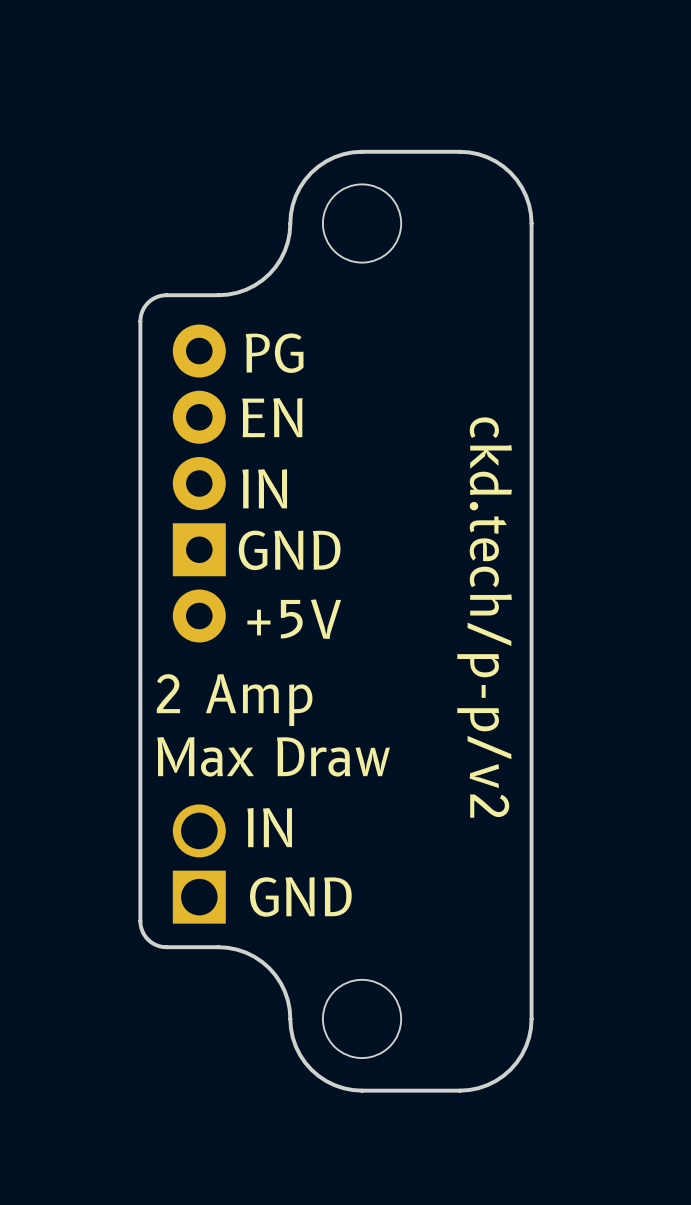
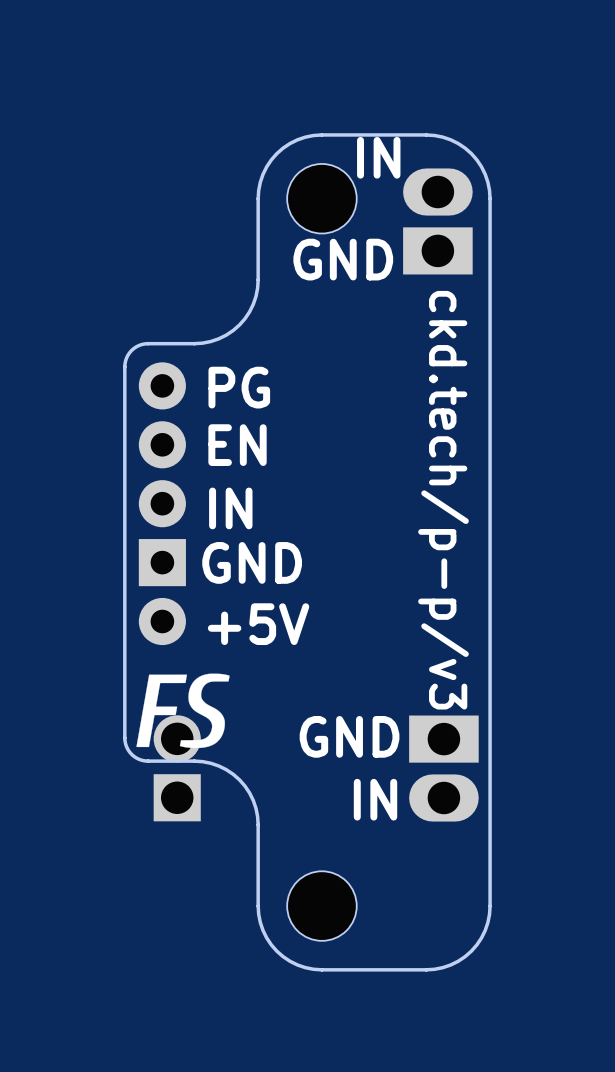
board edge: (459, 151) (487, 157) (510, 172) (526, 196) (531, 223) (530, 1028) (521, 1054) (503, 1075) (487, 1085) (459, 1090) -> (408, 134) (442, 137) (465, 148) (481, 166) (487, 182) (490, 198) (489, 914) (481, 937) (465, 956) (442, 967) (408, 969)
text: none -> IN (378, 157)
board edge: (290, 223) (287, 242) (280, 259) (269, 274) (254, 285) (227, 294) (163, 295) (153, 298) (145, 305) (140, 321) (140, 412) -> (258, 198) (257, 288) (253, 304) (244, 318) (226, 335) (210, 341) (139, 345) (129, 352) (124, 366)
part: none -> (437, 221)
text: none -> GND (343, 259)
text position: PG (274, 353) -> PG (239, 387)
text position: EN (272, 417) -> EN (237, 445)
part position: (199, 483) -> (162, 503)
text position: IN (264, 488) -> IN (230, 508)
text position: GND (289, 550) -> GND (252, 562)
text: ckd.tech/p-p/v2 (484, 617) -> ckd.tech/p-p/v3 (443, 500)
text position: +5V (294, 619) -> +5V (258, 624)
text: 2 Amp (234, 700) -> none
text: Max Draw (273, 756) -> none
drawing: none -> [136, 673, 230, 749]
text: IN (269, 827) -> none
board edge: (140, 829) (140, 921) (145, 937) (153, 943) (163, 946) (227, 947) (254, 956) (269, 968) (280, 983) (287, 1000) (290, 1018) -> (124, 737) (129, 752) (139, 759) (210, 763) (226, 769) (244, 786) (253, 800) (257, 816) (258, 906)
part: none -> (443, 768)
text position: GND (300, 896) -> GND (349, 736)
text: none -> IN (375, 799)

